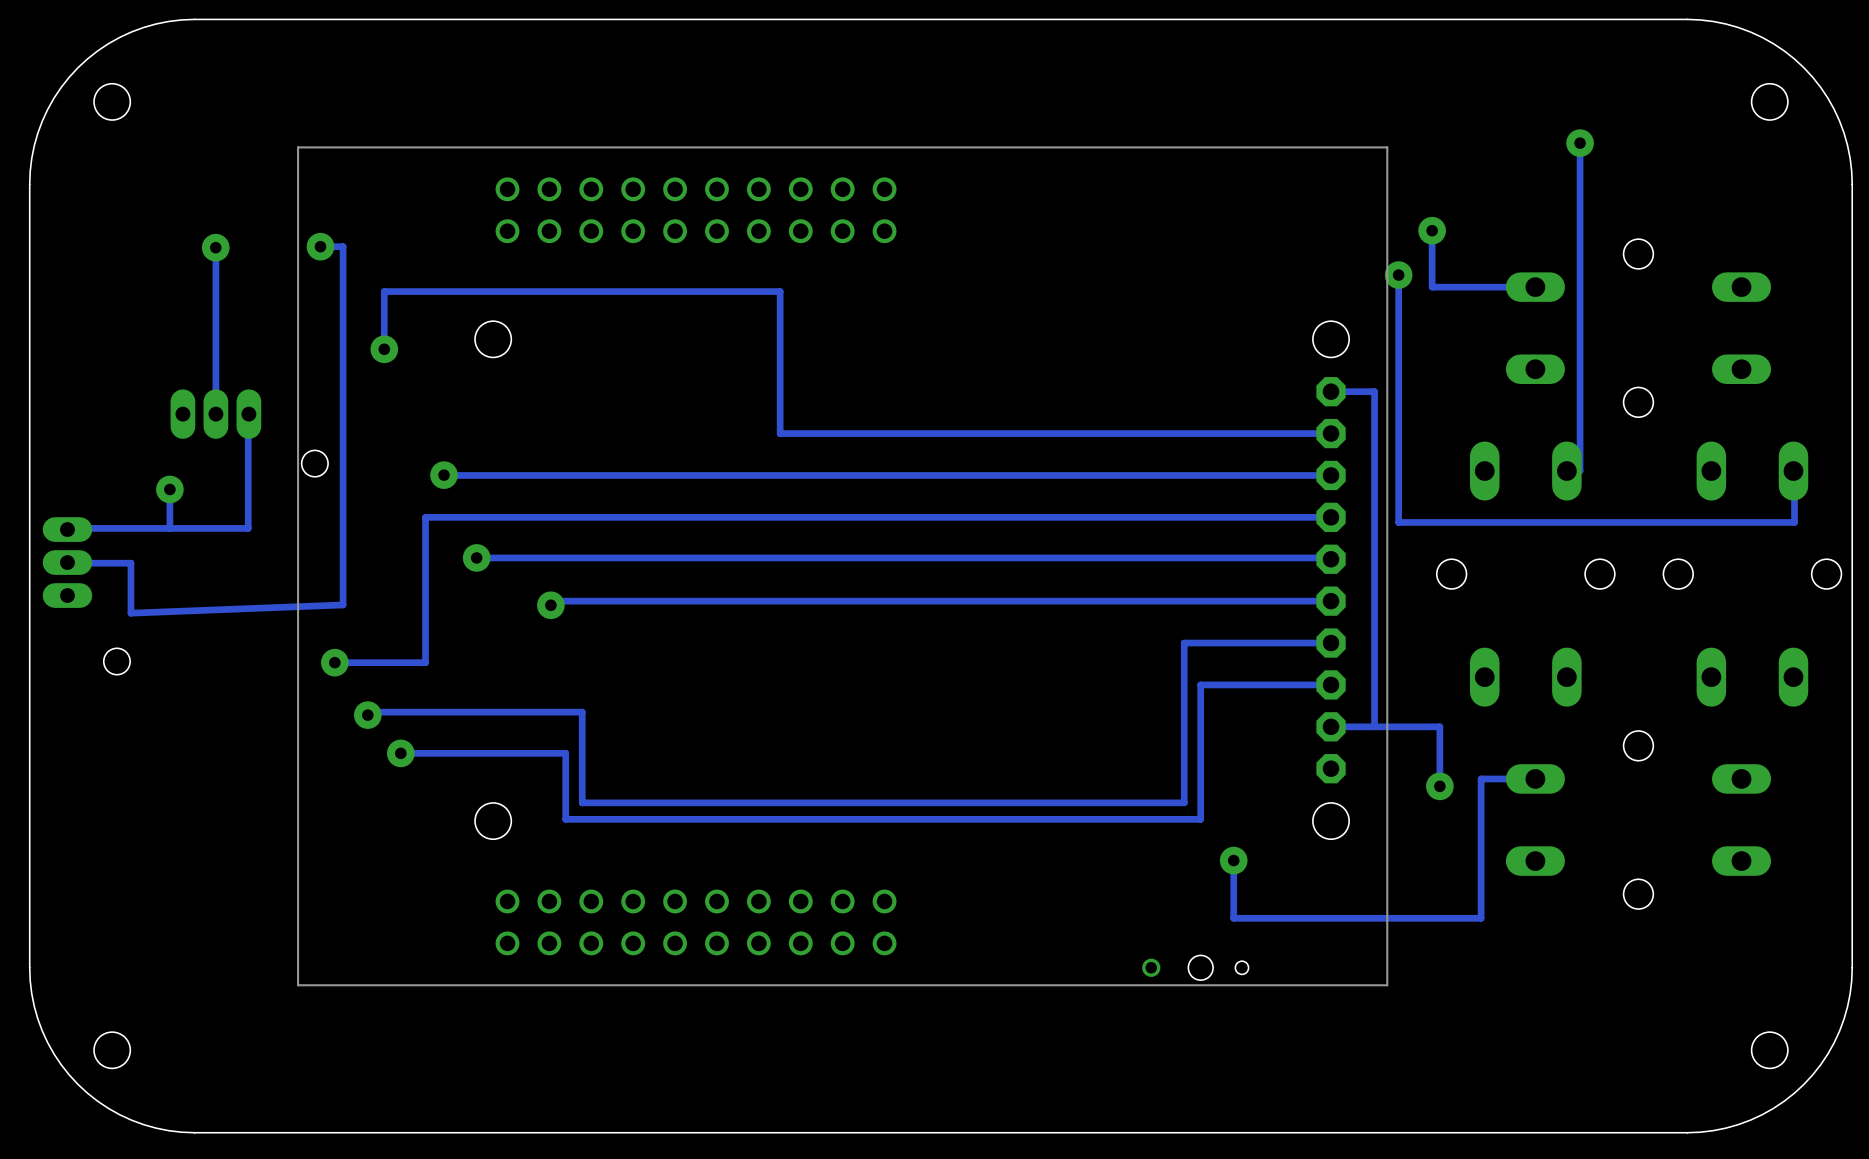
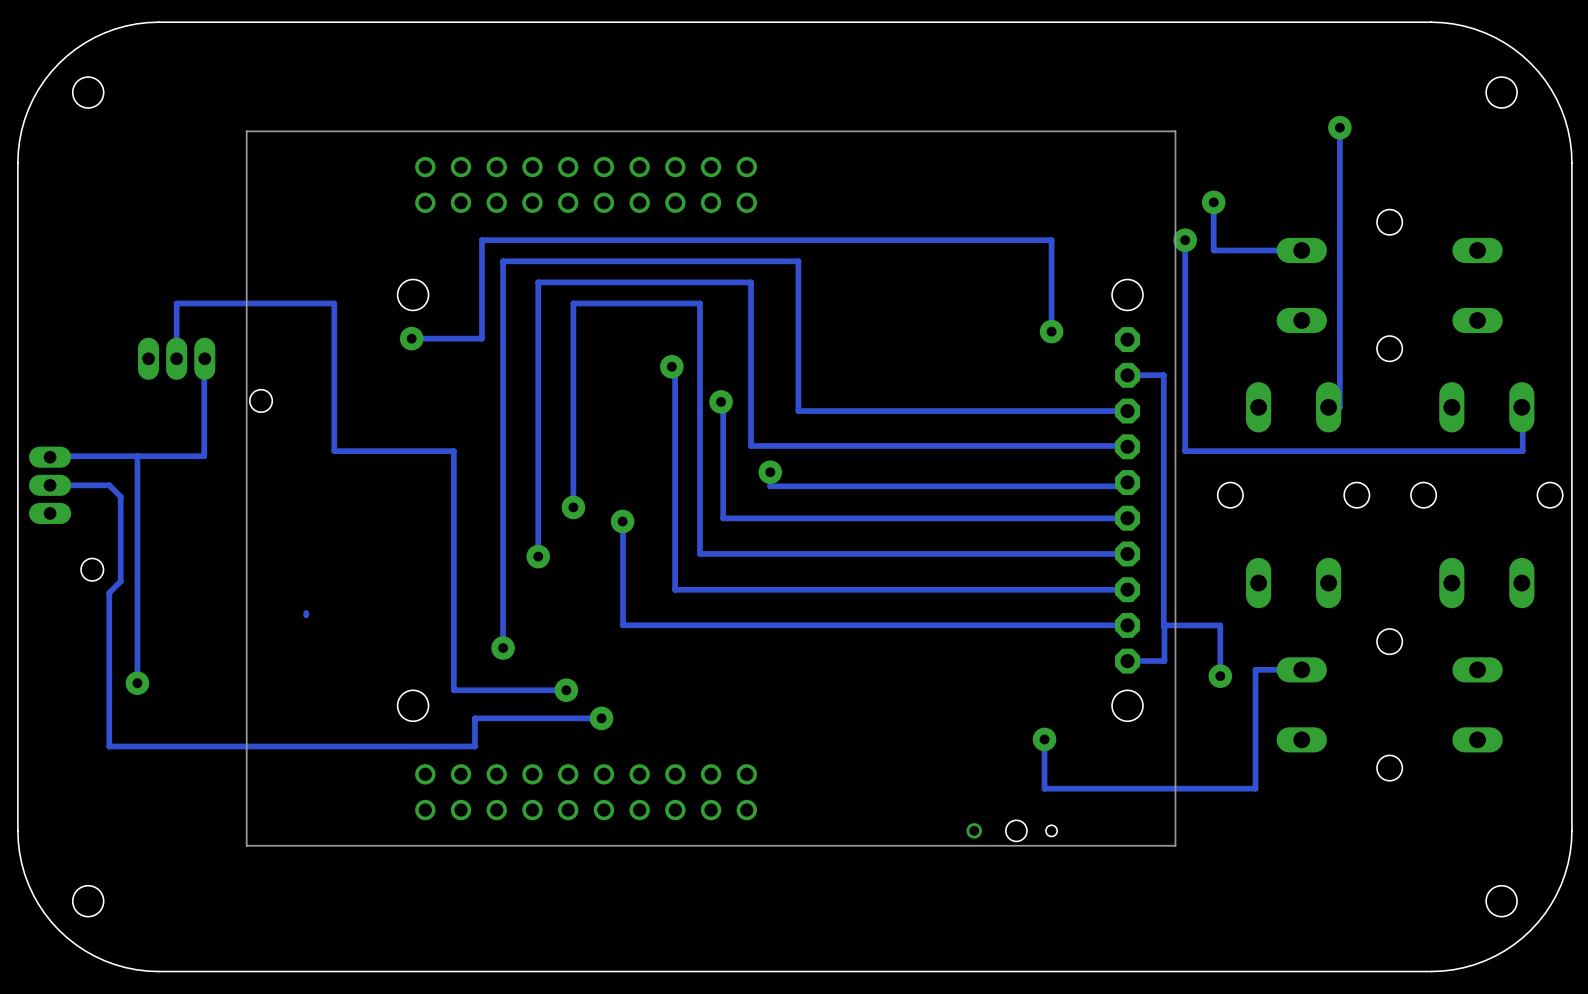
track: (320, 246) (343, 246) (343, 604) (130, 613) (130, 563) (67, 562) -> (601, 718) (474, 718) (474, 746) (109, 746) (109, 592) (120, 581) (120, 496) (109, 485) (50, 485)
via: (320, 246) -> none
track: (215, 247) (215, 349) -> none
via: (215, 247) -> none
track: (384, 349) (384, 291) (780, 291) (780, 433) (1331, 433) -> (1163, 625) (1163, 375) (1127, 375)
via: (384, 349) -> none
track: none -> (1051, 331) (1051, 240) (481, 240) (481, 338) (411, 338)
via: none -> (1051, 331)
via: none -> (411, 338)
track: (1331, 391) (1374, 391) (1374, 726) -> none
via: none -> (671, 366)
via: none -> (721, 401)
via: (444, 475) -> none
track: (945, 475) (444, 475) -> (798, 411) (798, 261) (503, 261) (503, 648)
track: (169, 489) (169, 528) -> (137, 683) (137, 456)
via: (169, 489) -> none
track: (1331, 517) (425, 517) (425, 662) (334, 662) -> (1127, 446) (751, 445) (751, 282) (538, 282) (538, 556)
via: none -> (770, 472)
track: (476, 557) (1331, 559) -> (770, 472) (770, 486) (1127, 486) (1127, 482)
via: (476, 557) -> none
via: none -> (573, 507)
track: (1331, 601) (550, 601) (550, 605) -> (1127, 518) (723, 518) (723, 401) (721, 401)
track: none -> (622, 521) (623, 625) (1127, 625)
via: none -> (622, 521)
via: (550, 605) -> none
track: (1184, 643) (1184, 802) (672, 802) -> (1002, 553) (699, 553) (699, 303) (573, 303) (573, 507)
via: none -> (538, 556)
via: (334, 662) -> none
track: (1331, 684) (1200, 684) (1200, 819) (565, 819) (565, 753) (400, 753) -> (1127, 589) (675, 589) (675, 366) (671, 366)
track: (367, 712) (582, 712) (582, 802) -> (176, 303) (334, 303) (334, 451) (453, 451) (453, 690) (489, 690)
via: (367, 715) -> none
track: (1373, 726) (1331, 726) -> (1164, 625) (1164, 660) (1127, 660)
via: (400, 753) -> none
via: none -> (503, 648)
via: none -> (137, 683)
via: none -> (566, 690)
via: none -> (601, 718)

